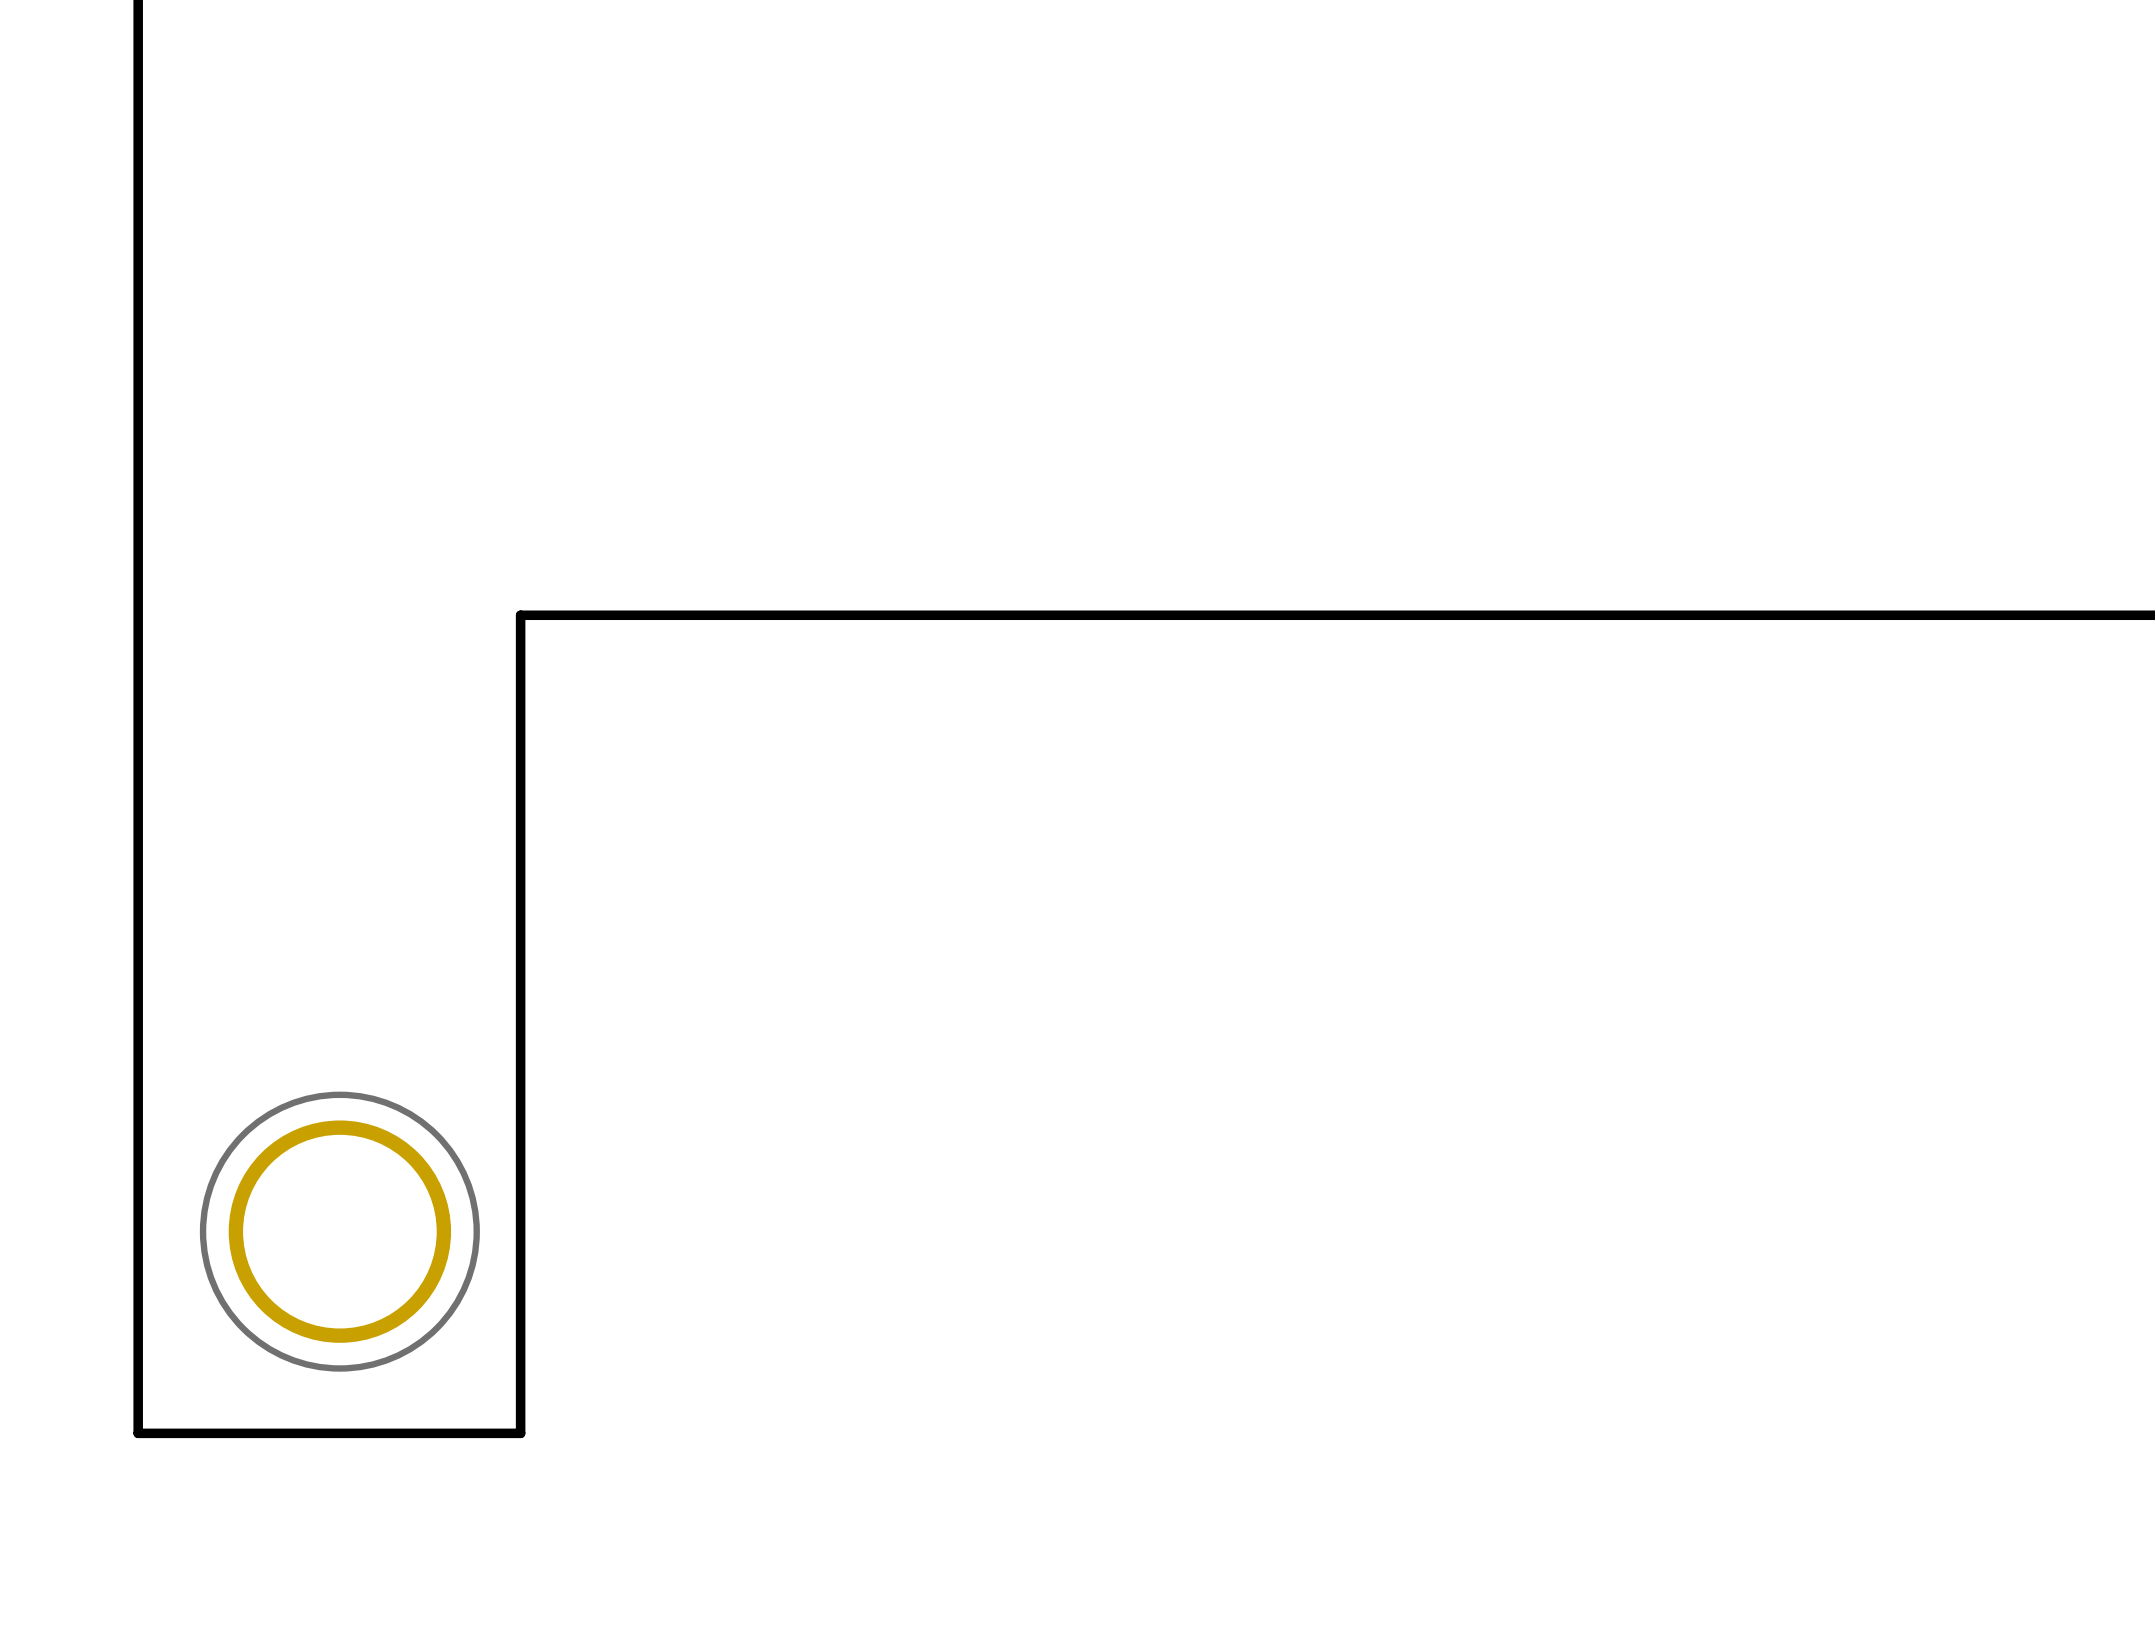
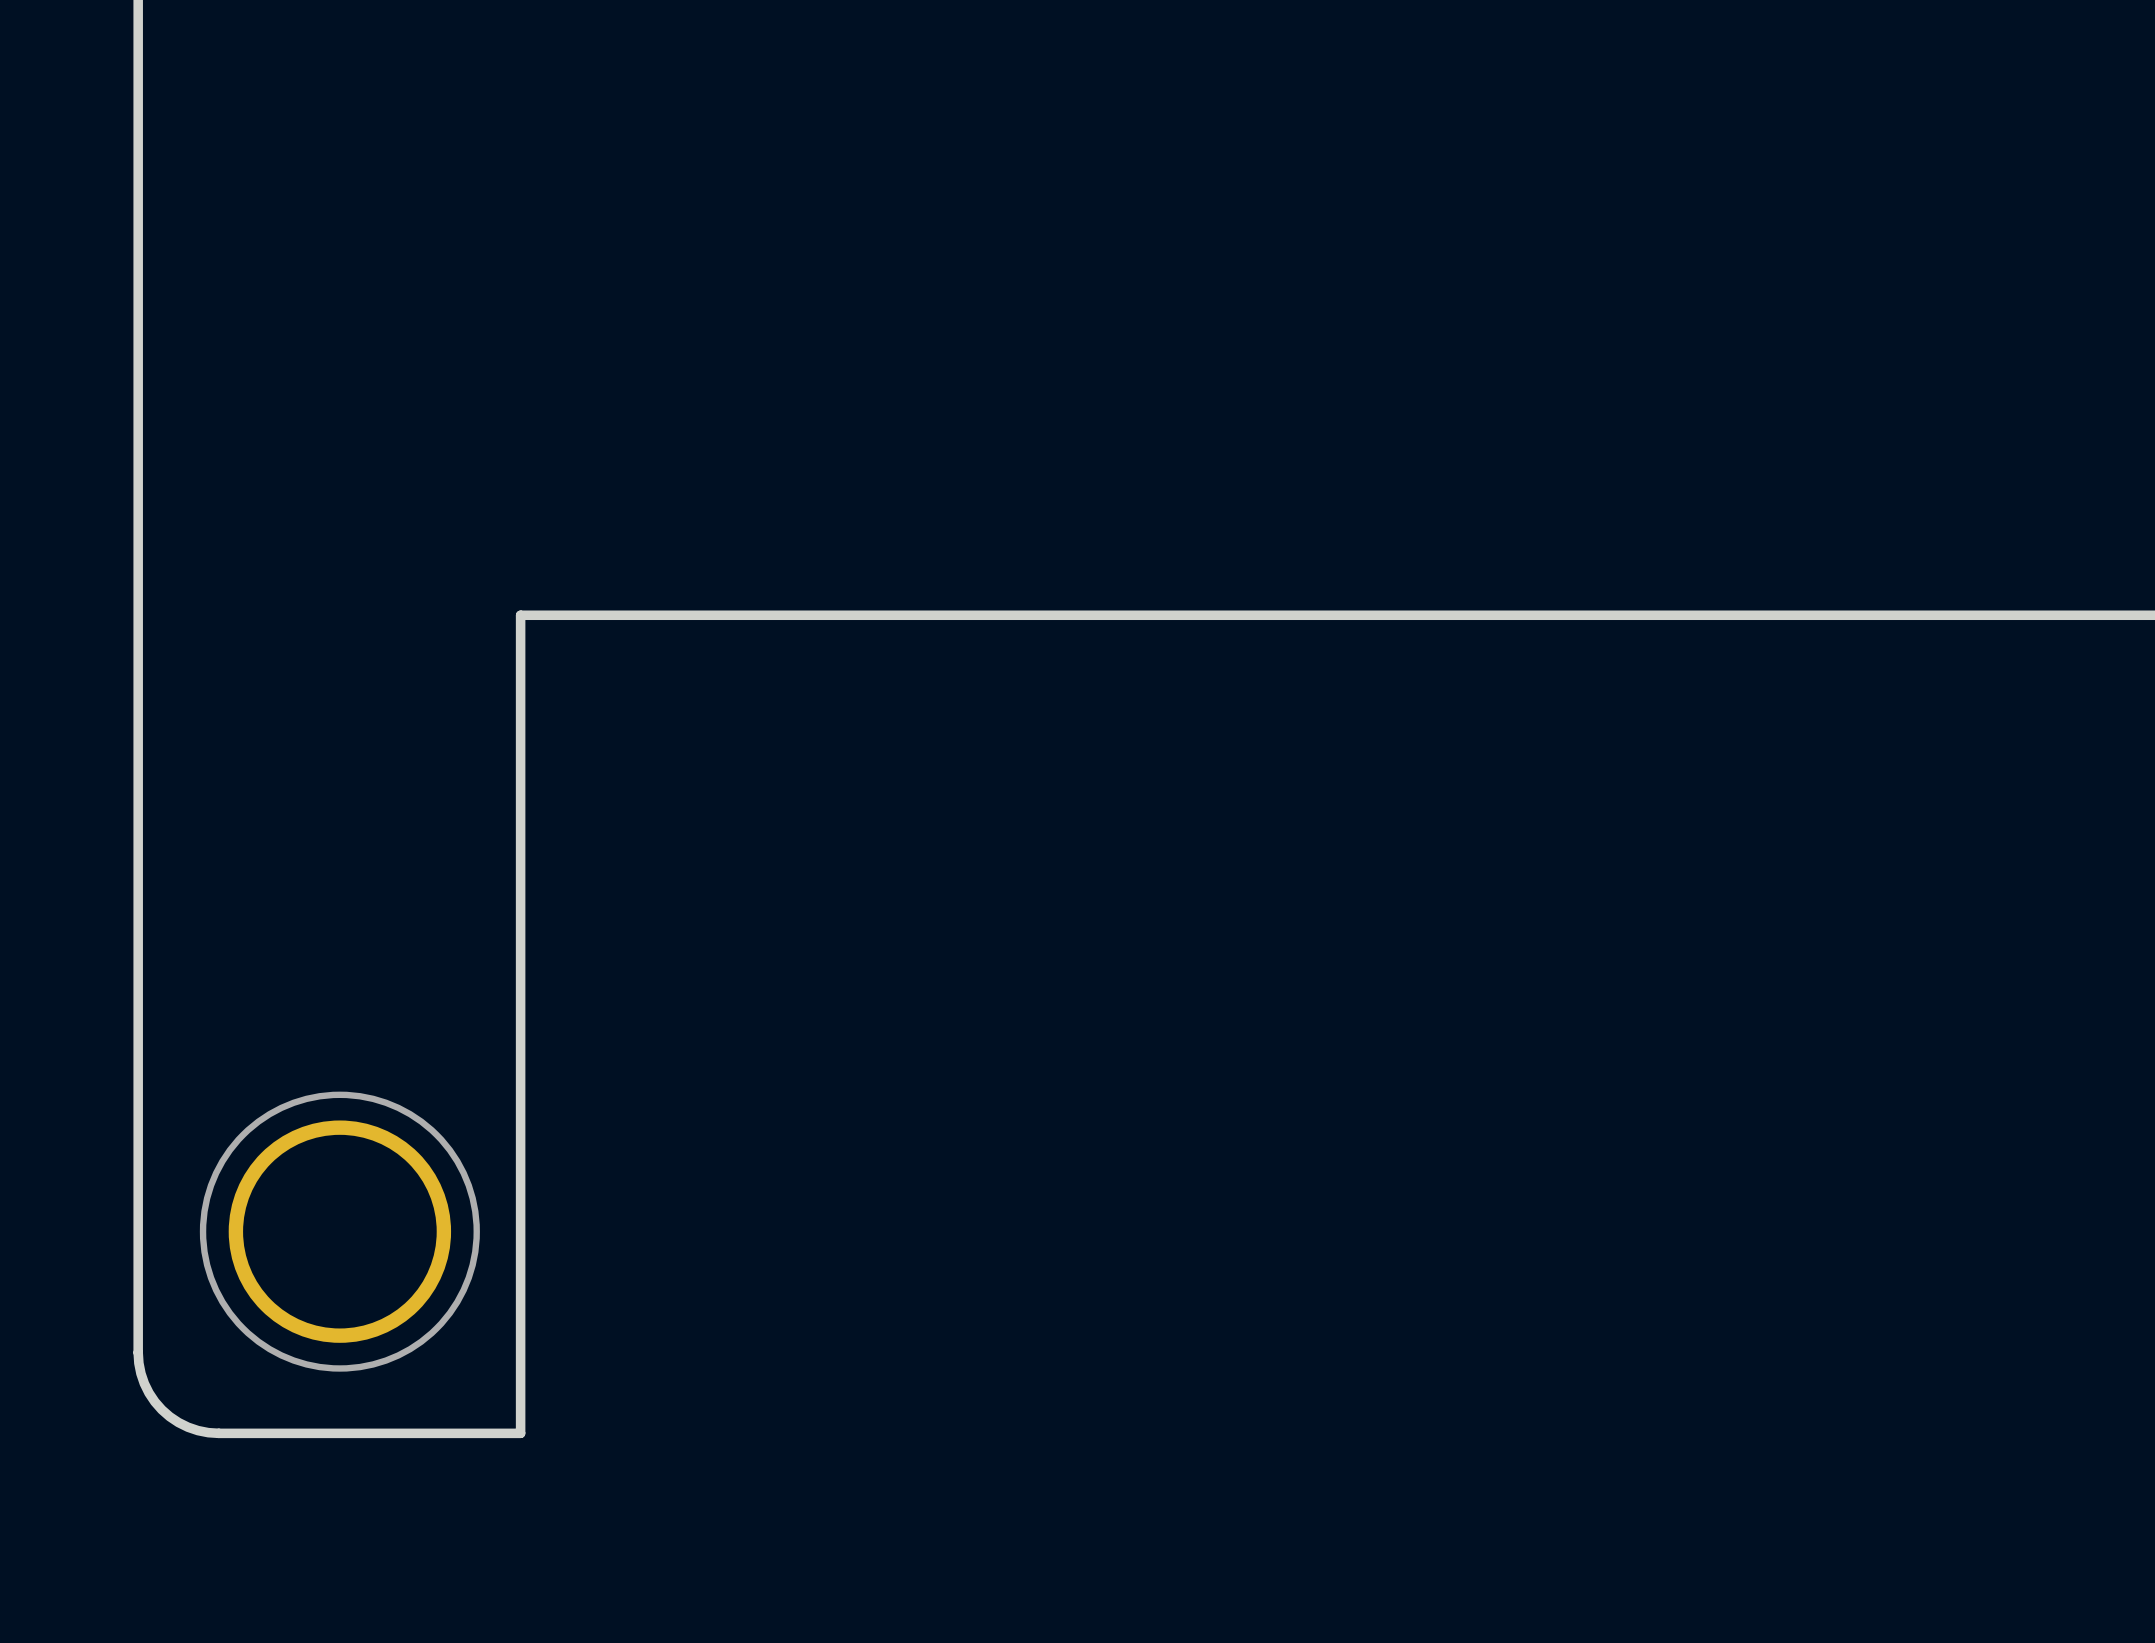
board edge: (138, 1352) (138, 1433) (218, 1433) -> (138, 1352) (144, 1383) (161, 1409) (187, 1427) (218, 1433)

